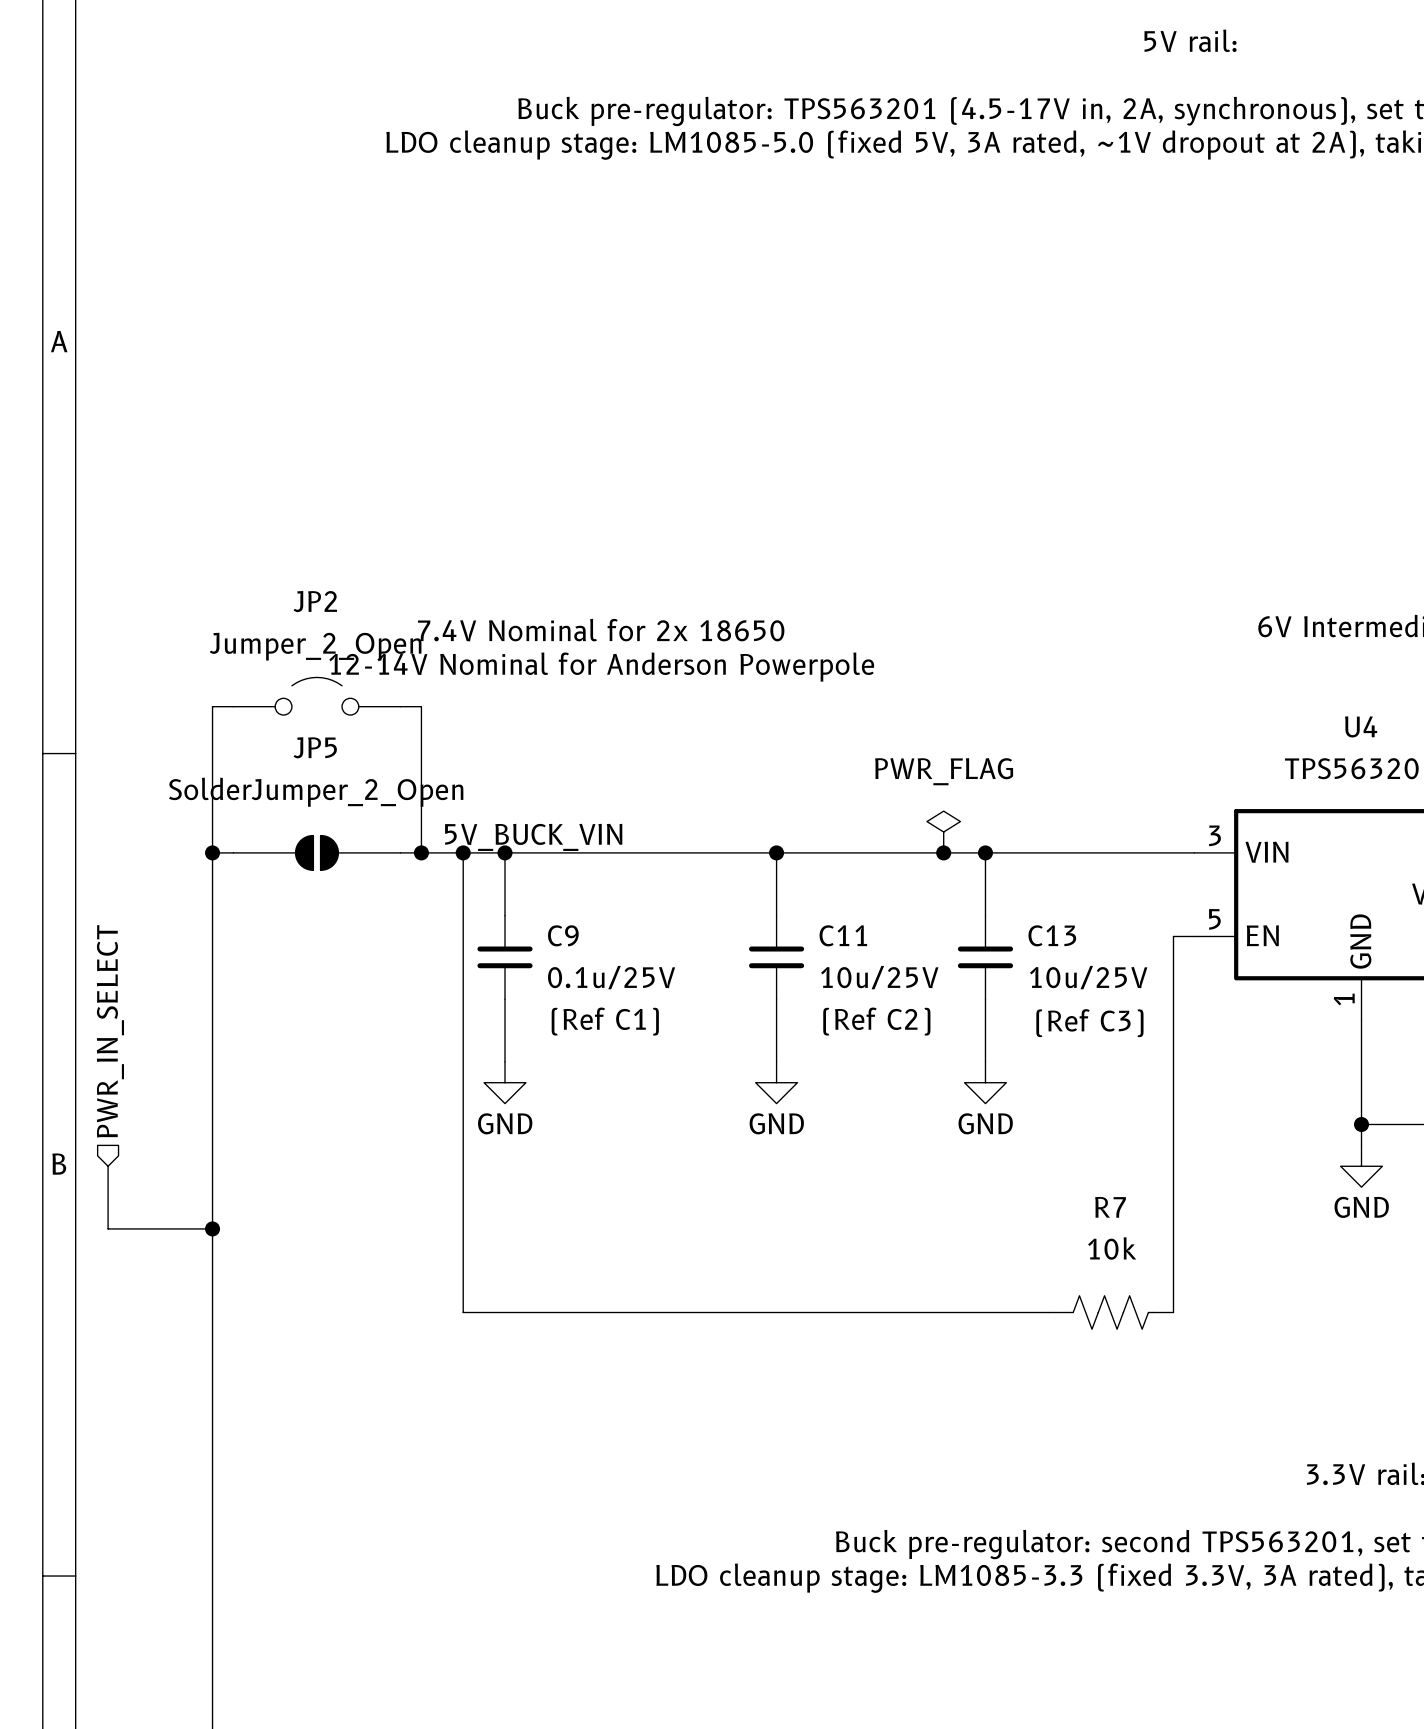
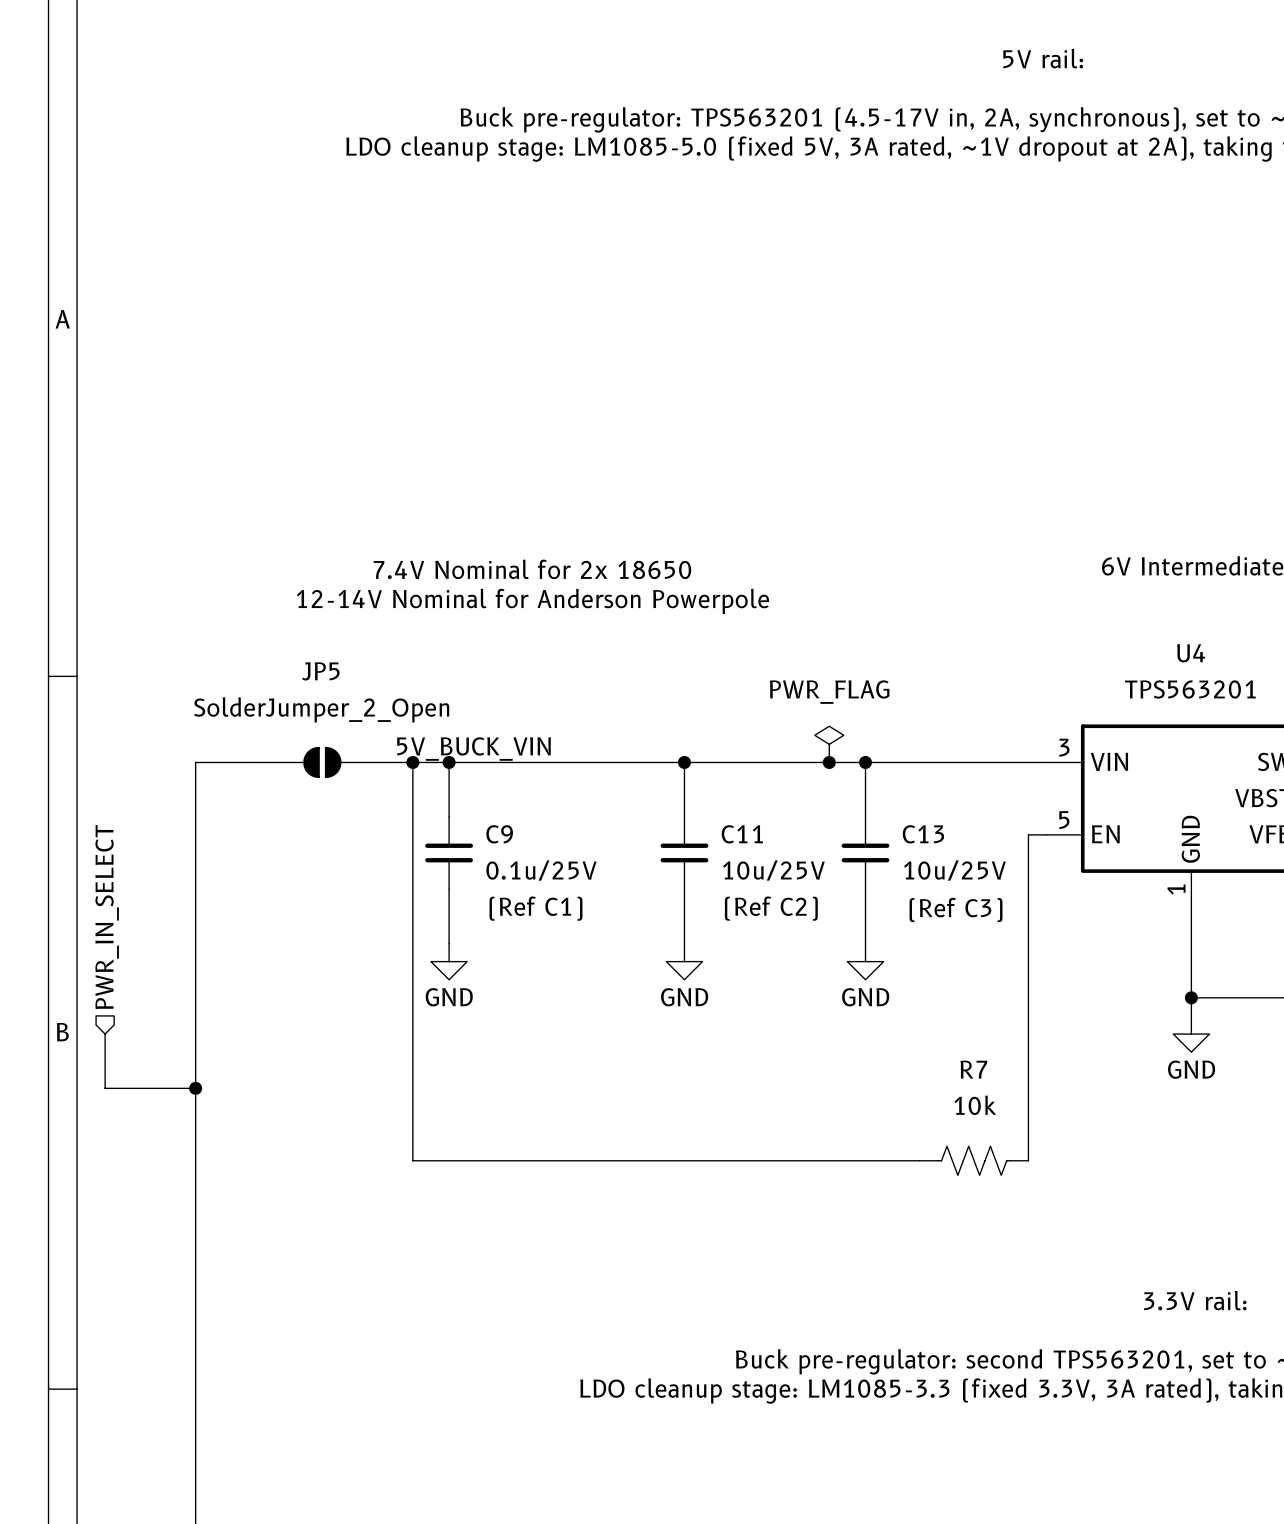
JP2: Jumper_2_Open (316, 696) -> none
wire: (233, 706) (212, 706) (212, 852) -> none
wire: (400, 706) (421, 706) (421, 852) -> none
junction: (212, 852) -> none
JP5 position: (316, 852) -> (322, 762)
junction: (421, 852) -> none

